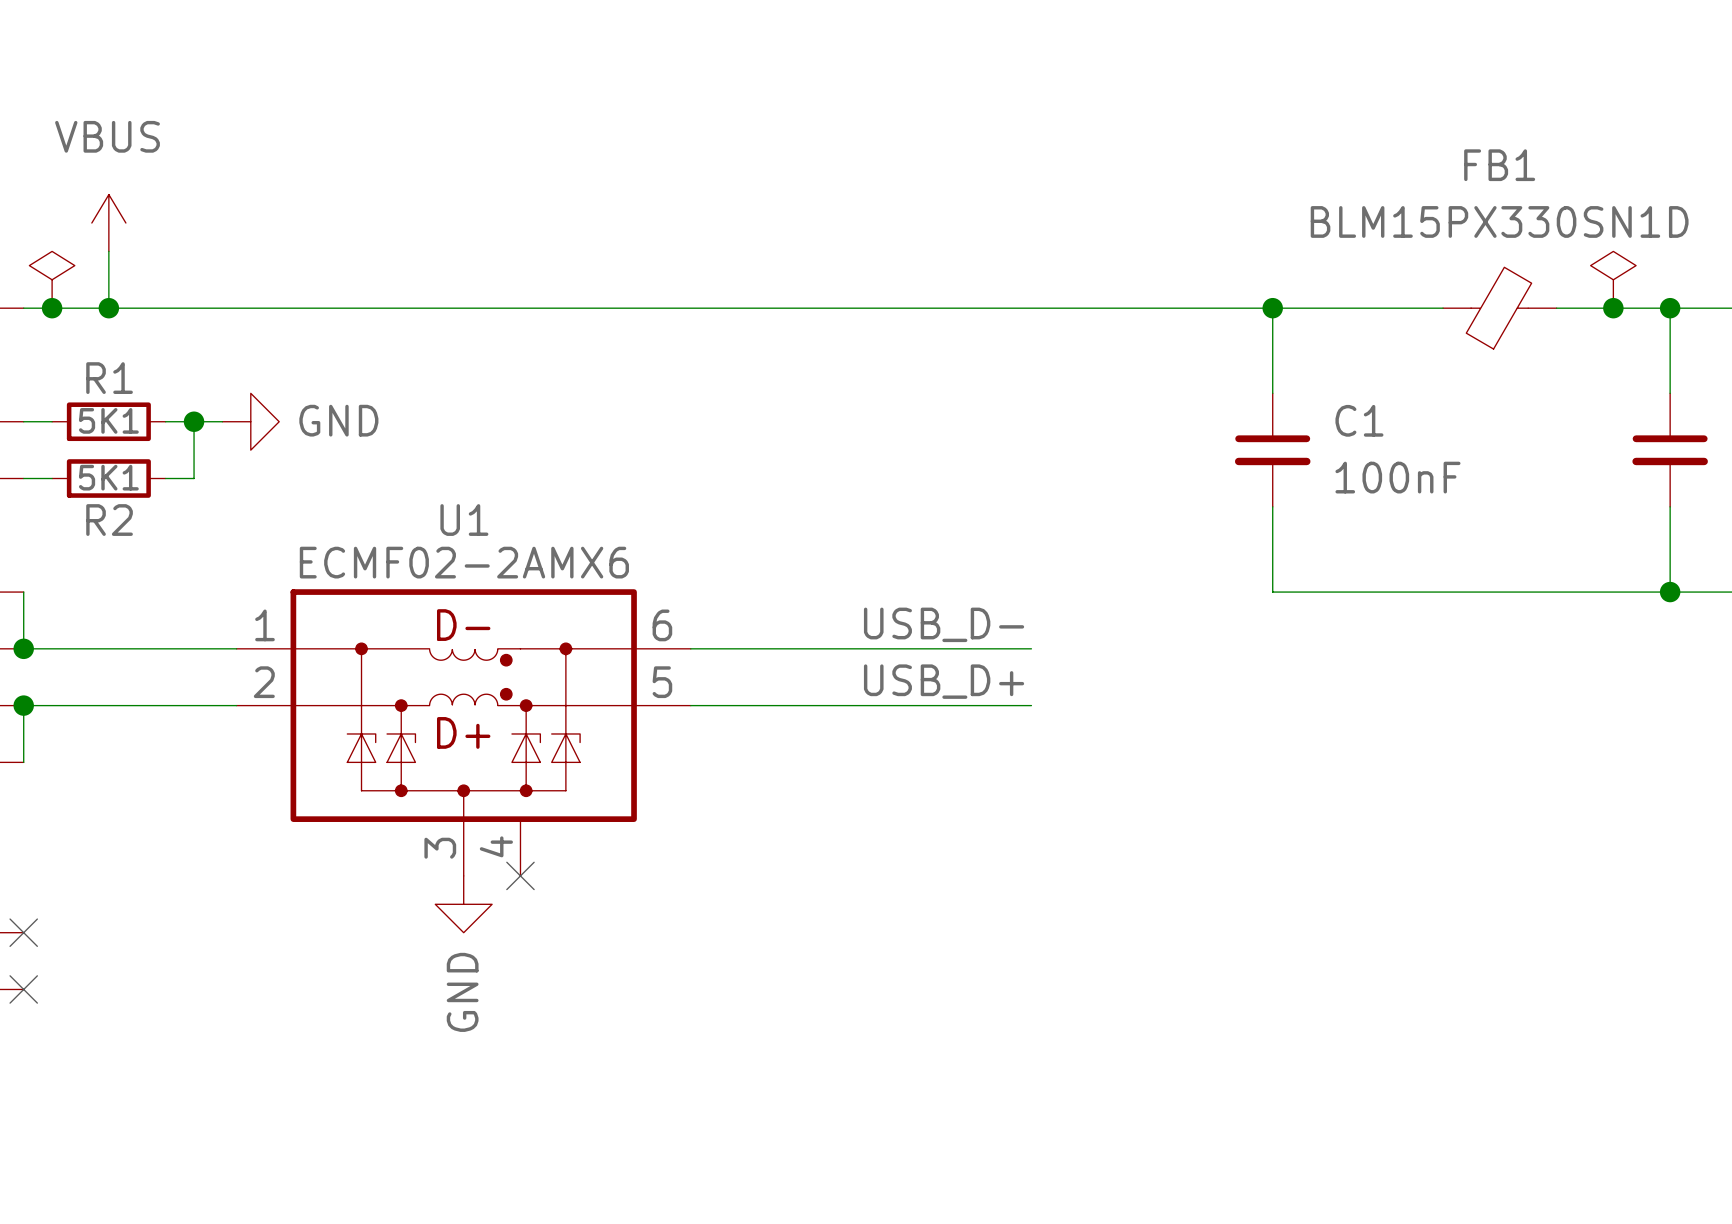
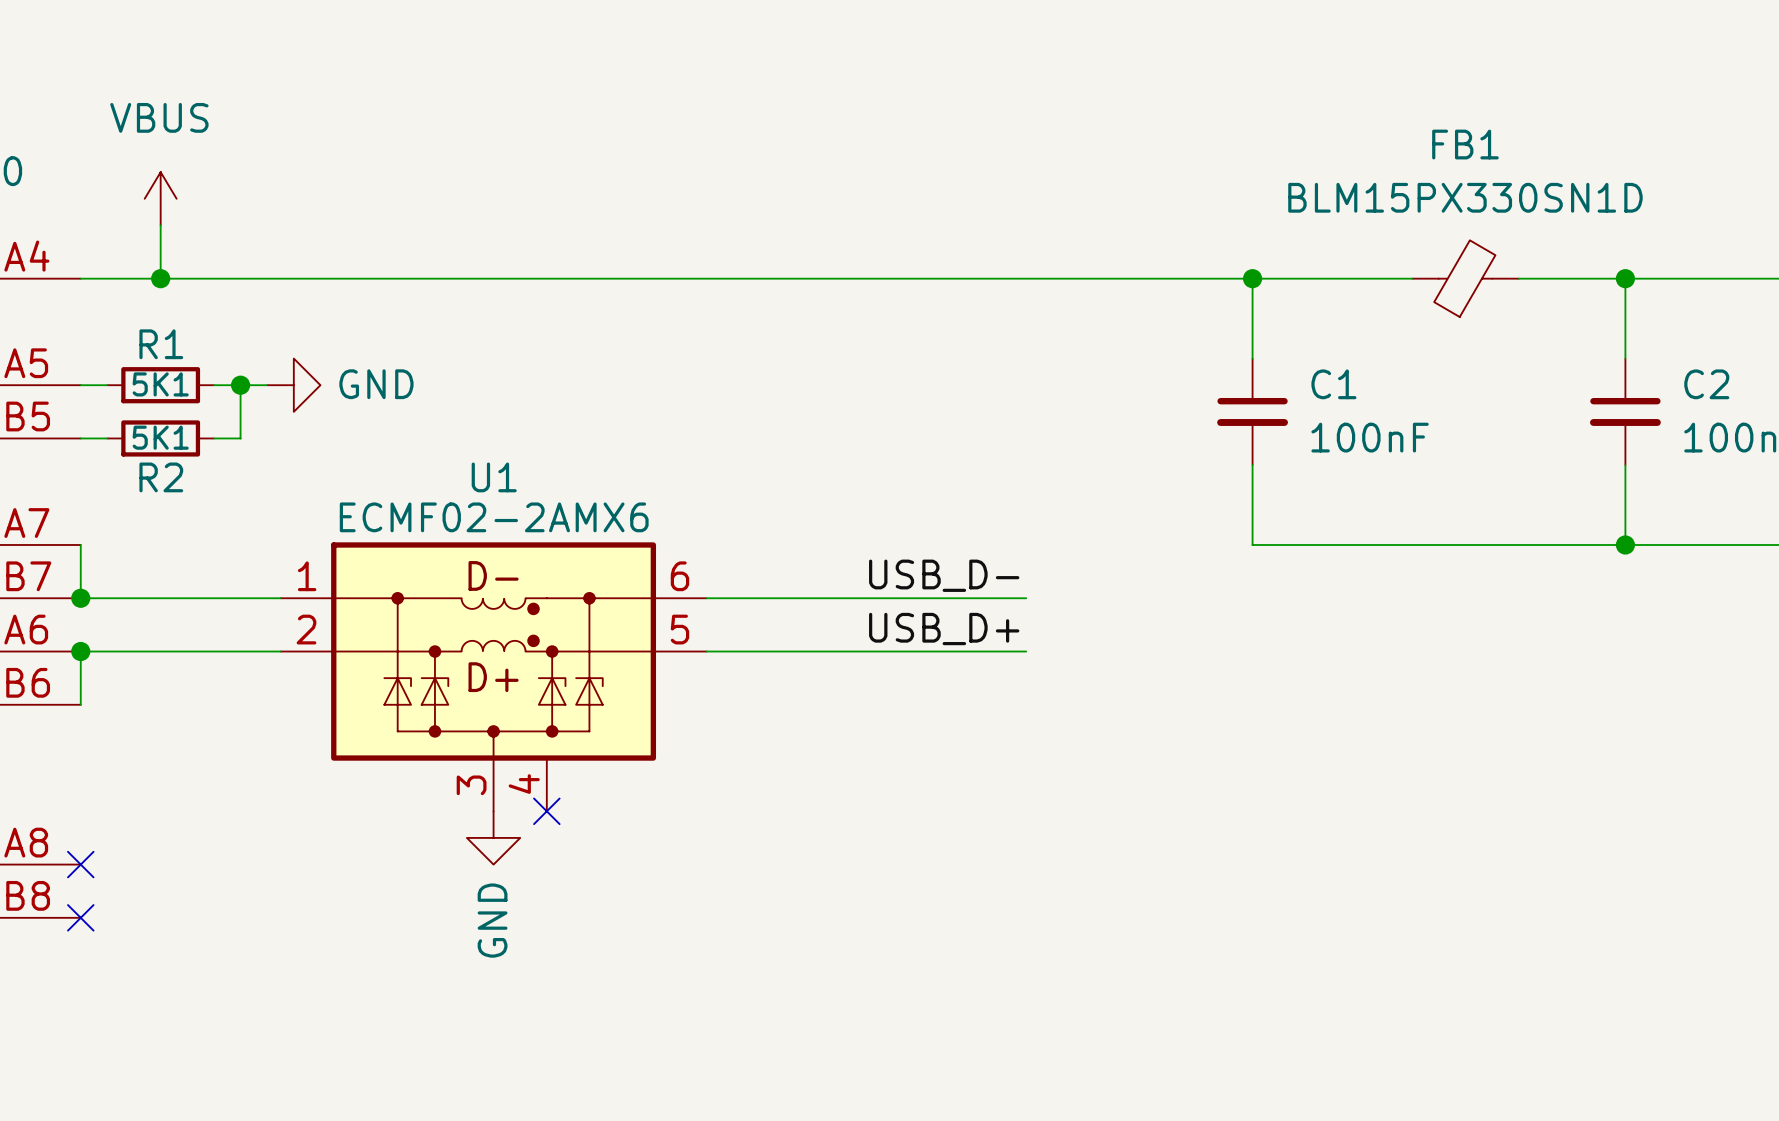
power symbol: (52, 279) -> none
power symbol: (1613, 279) -> none
junction: (52, 308) -> none
junction: (1613, 308) -> none

